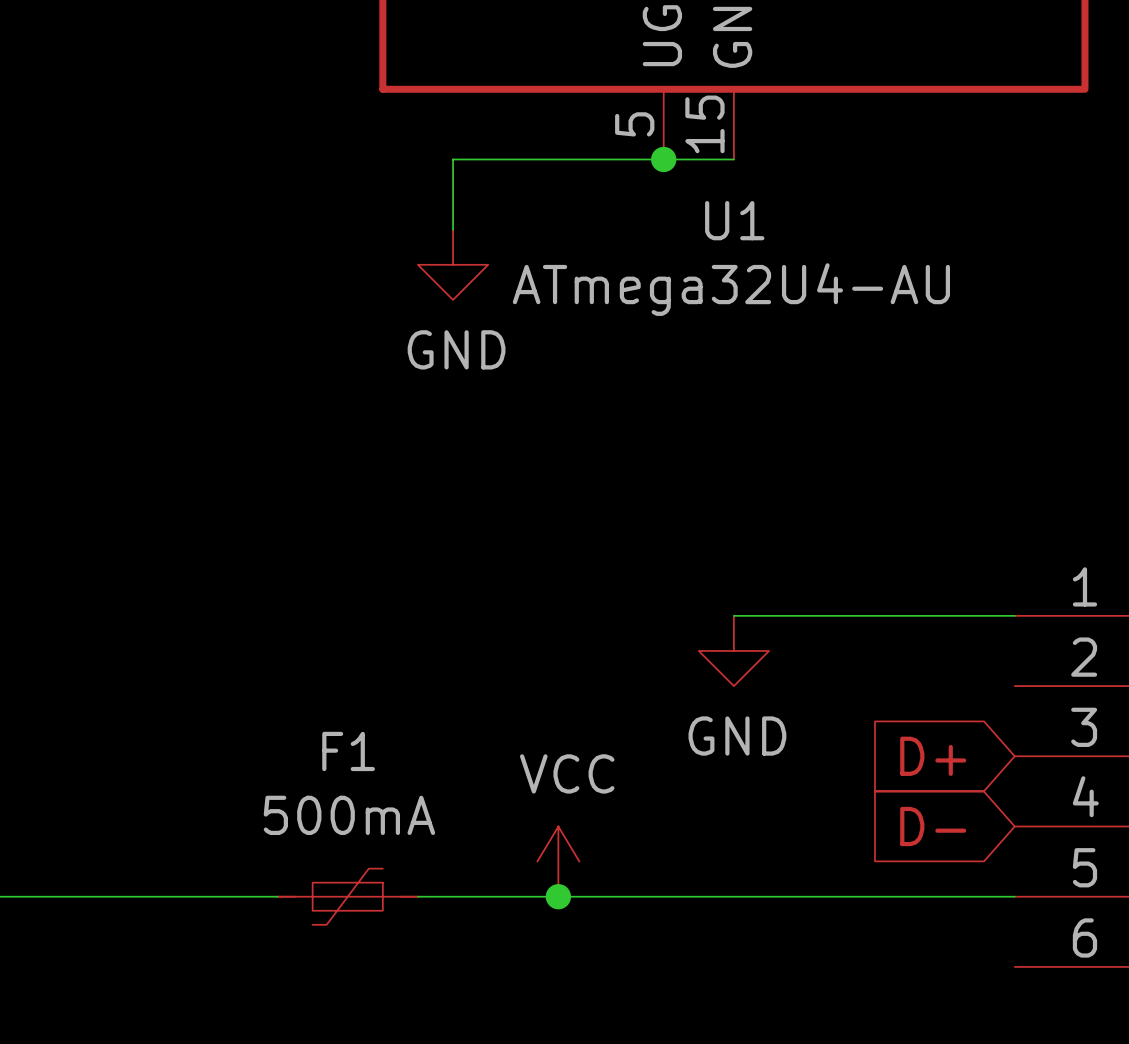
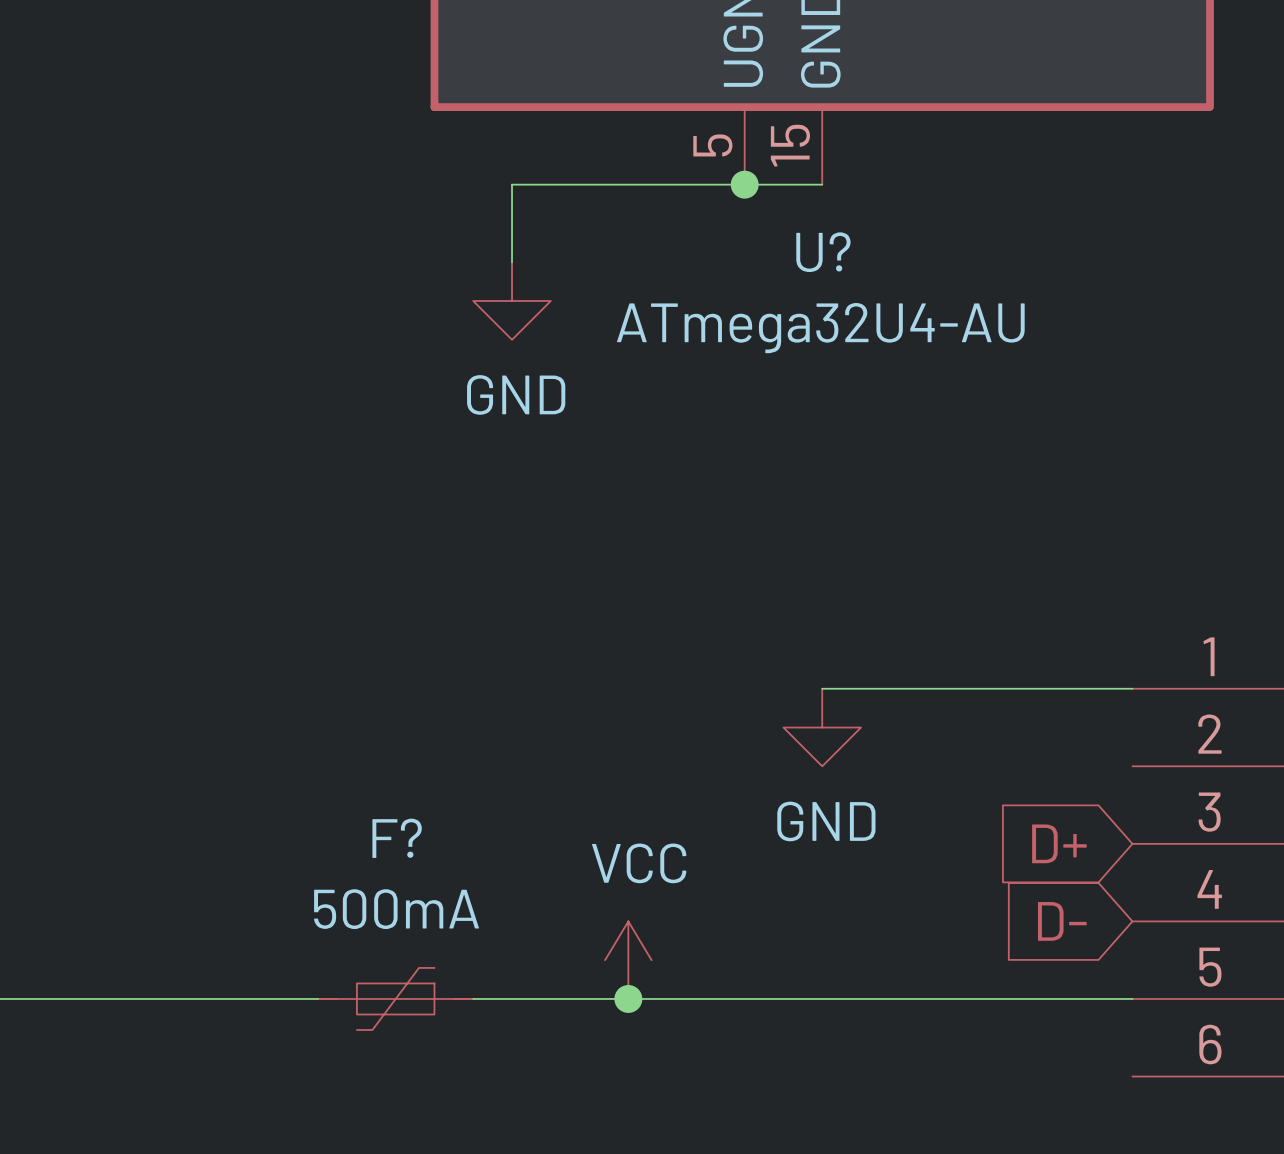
U1 name: U1 (734, 220) -> U? (823, 252)
F1 name: F1 (348, 751) -> F? (397, 838)

